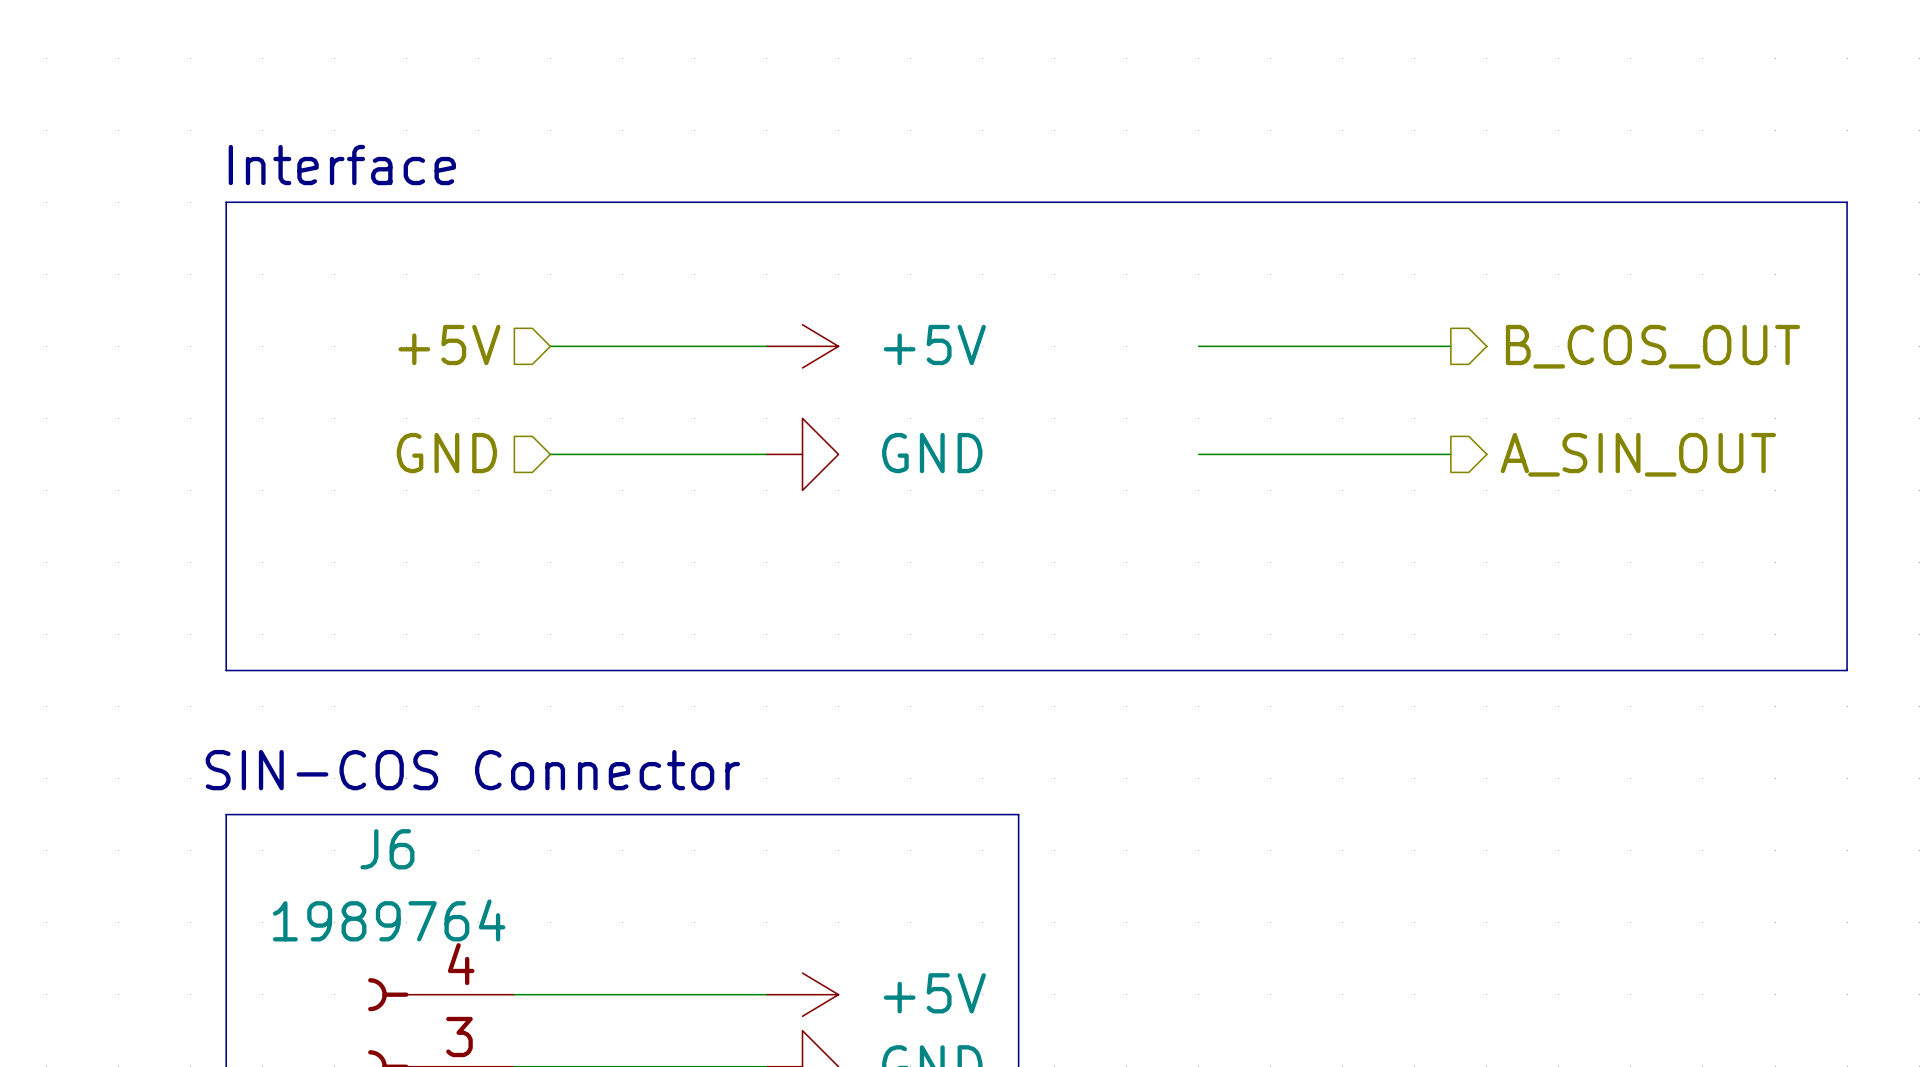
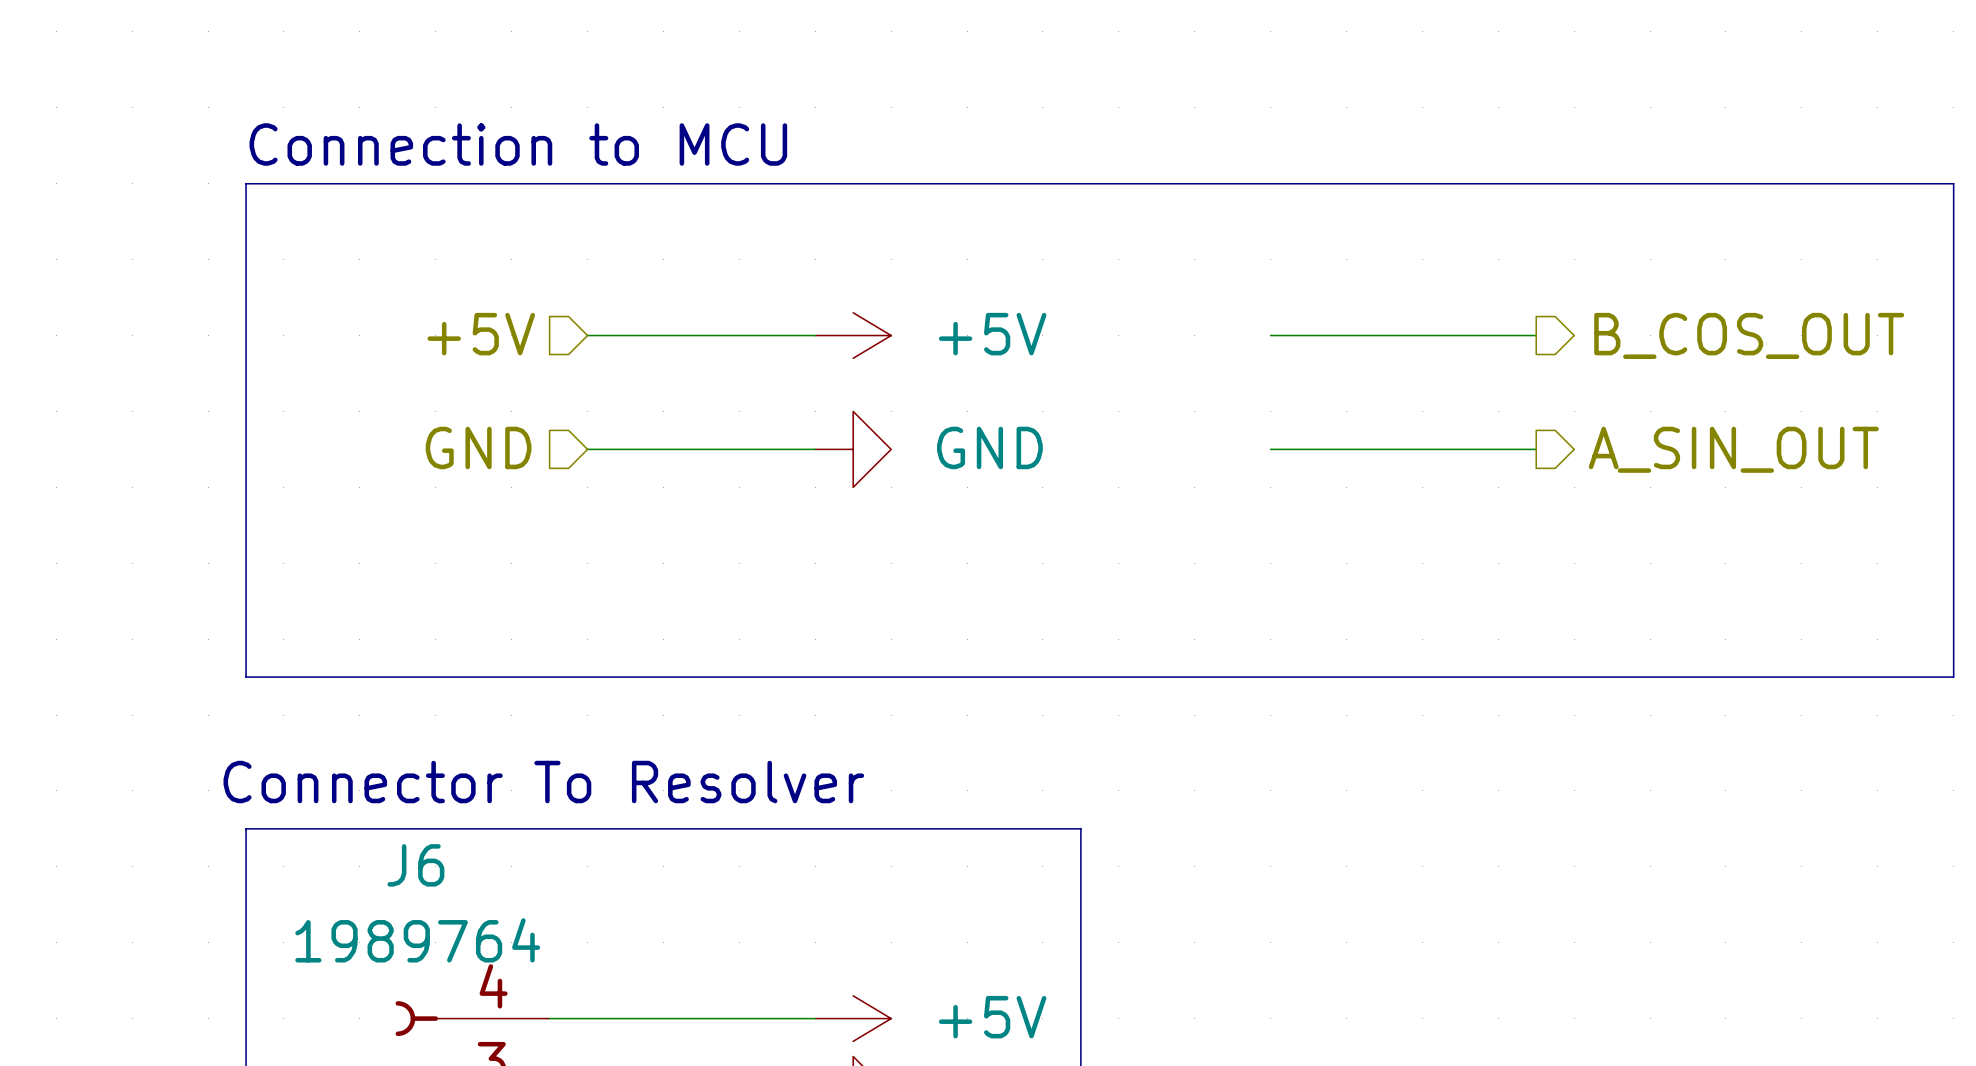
text: Interface (342, 165) -> none
text: none -> Connection to MCU (518, 144)
text: SIN-COS Connector (472, 770) -> none
text: none -> Connector To Resolver (543, 782)

